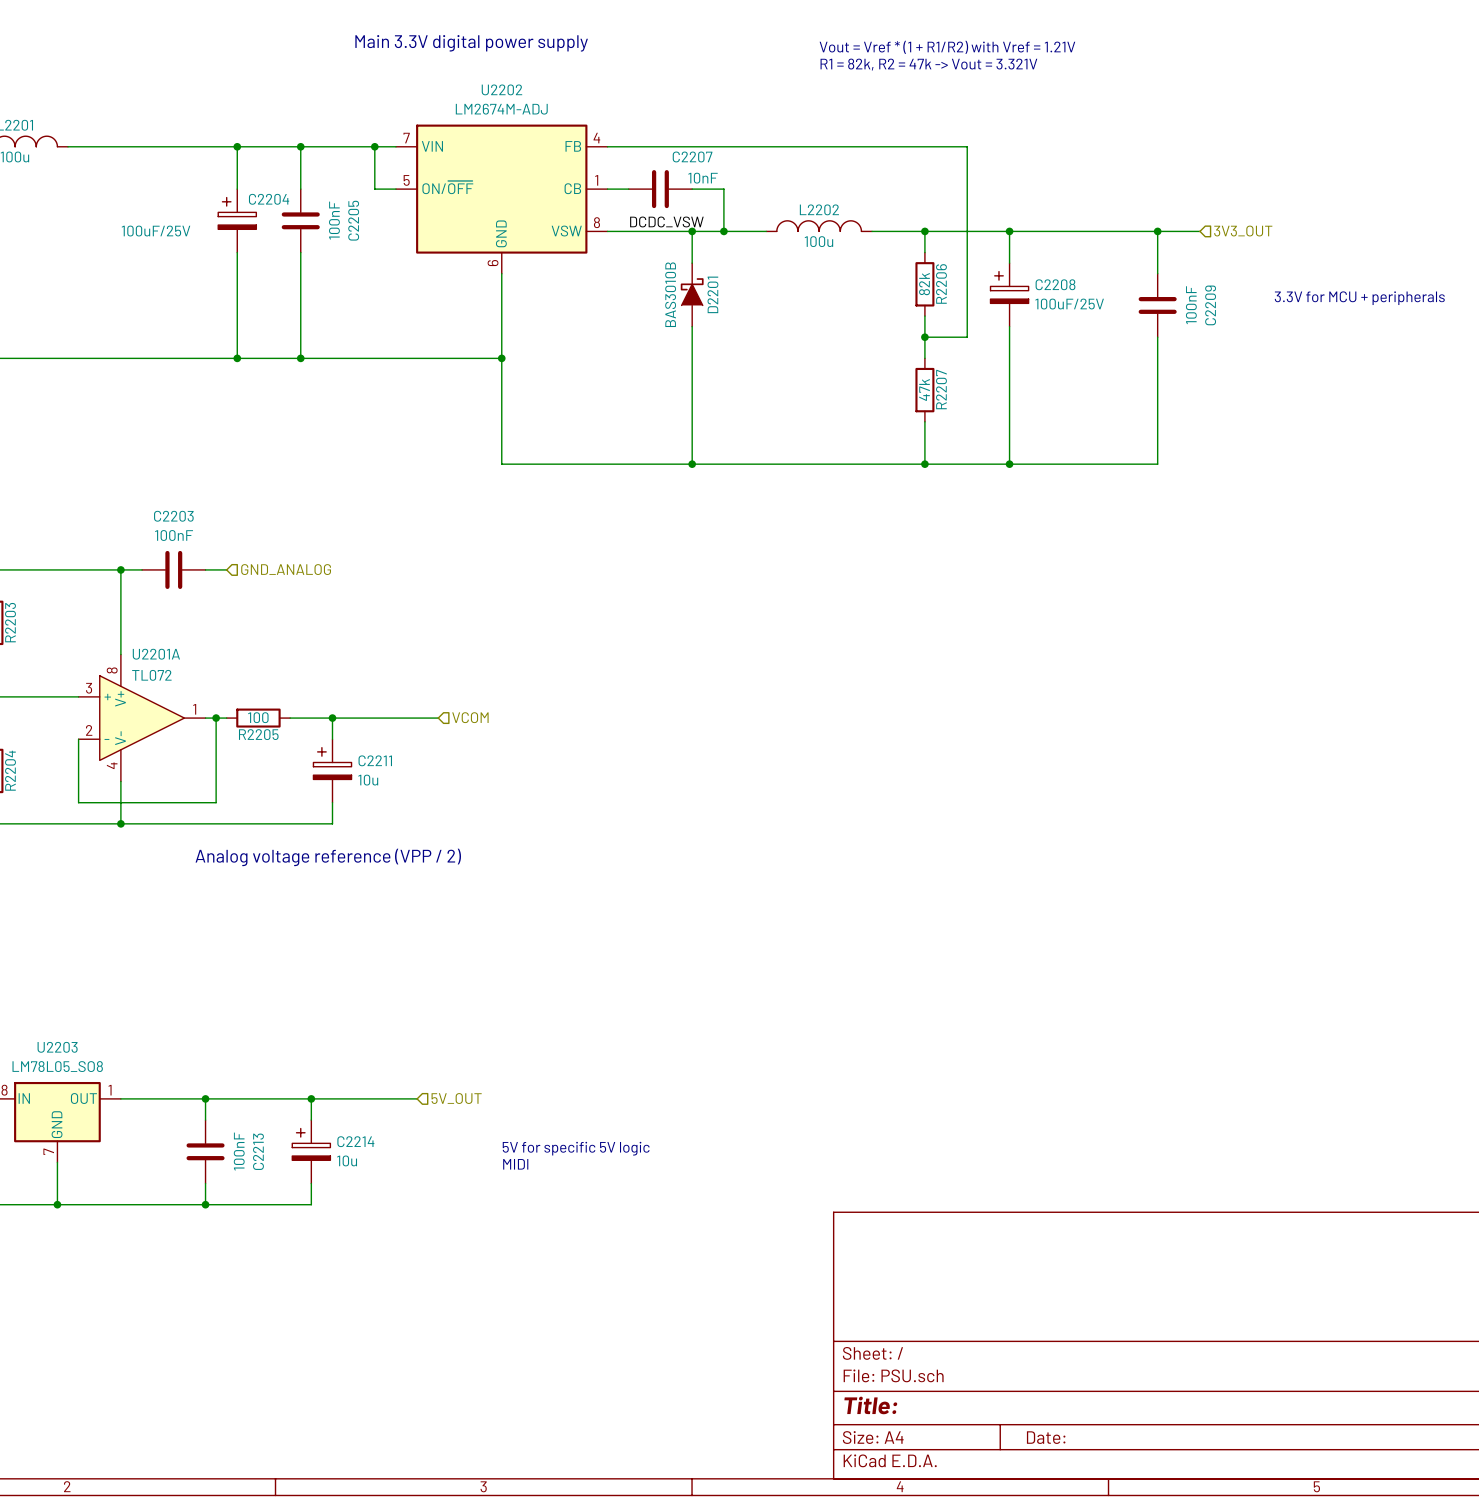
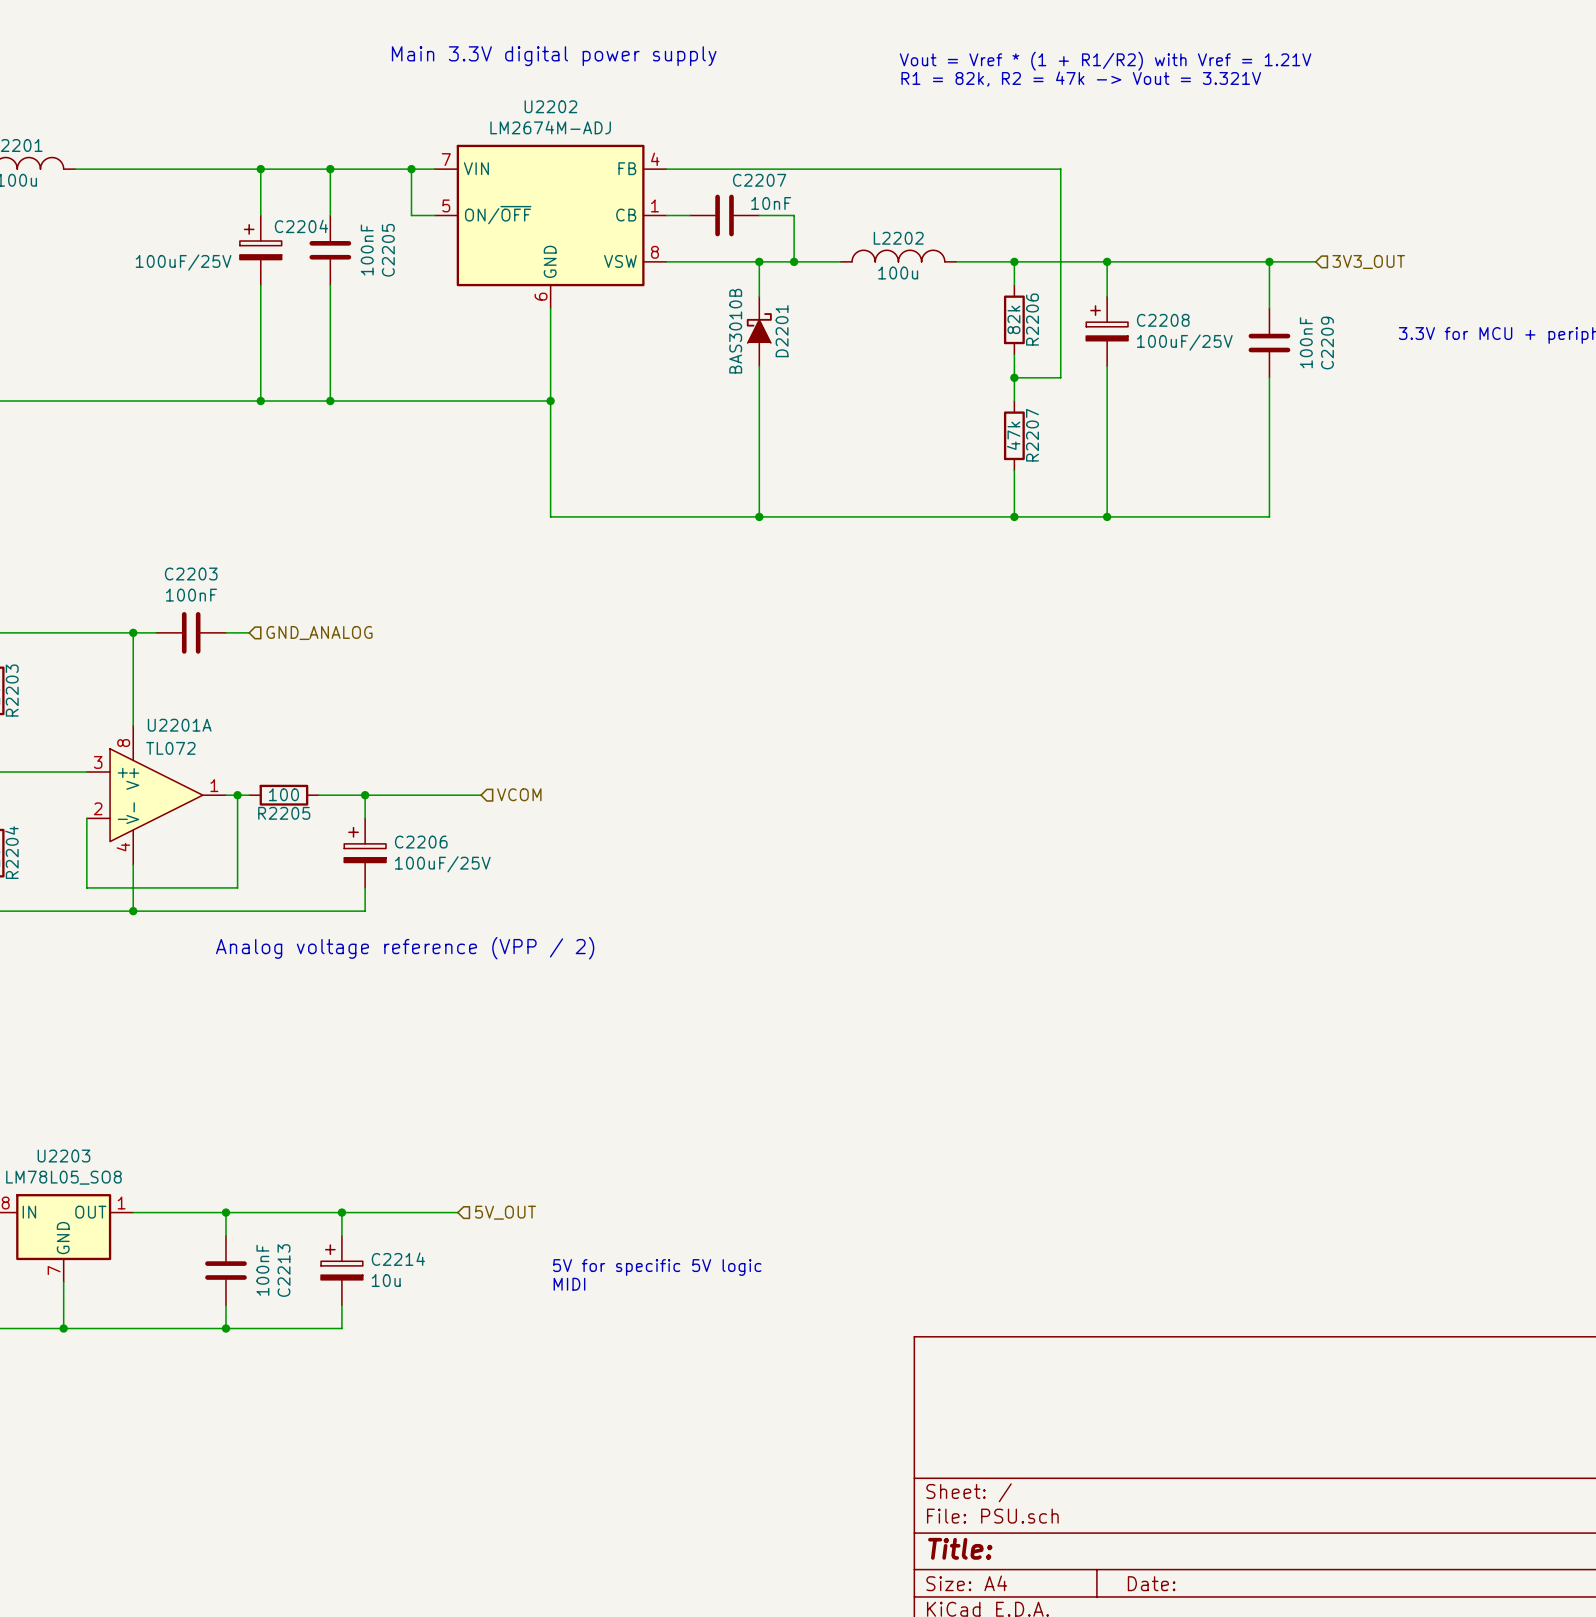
label: DCDC_VSW (666, 221) -> none
C2211 name: C2211 (375, 760) -> C2206 (421, 842)
C2211 value: 10u (368, 780) -> 100uF/25V (442, 864)

